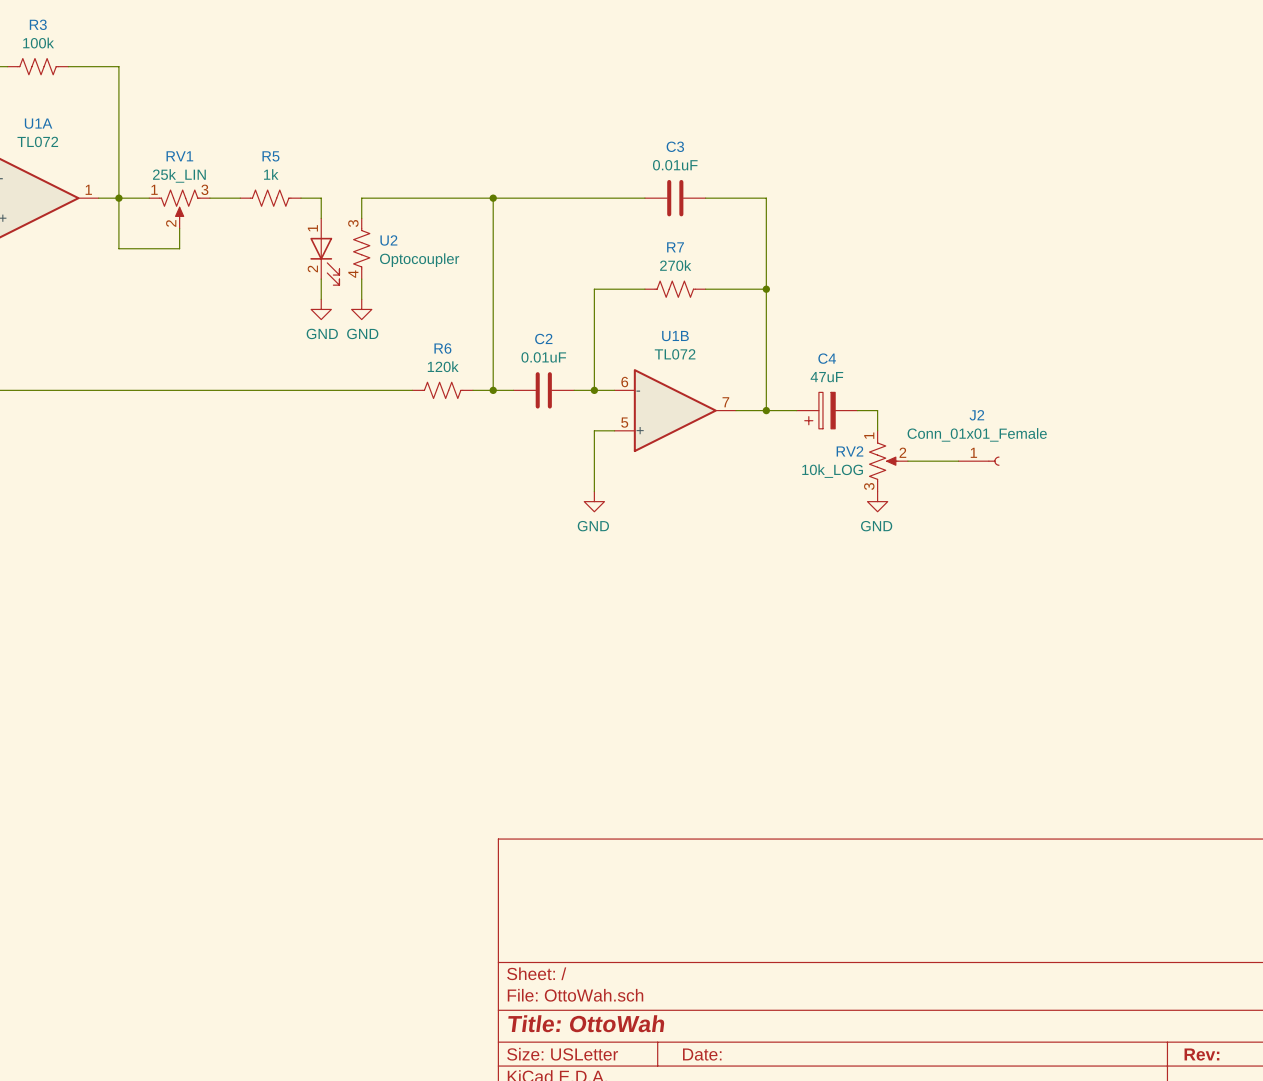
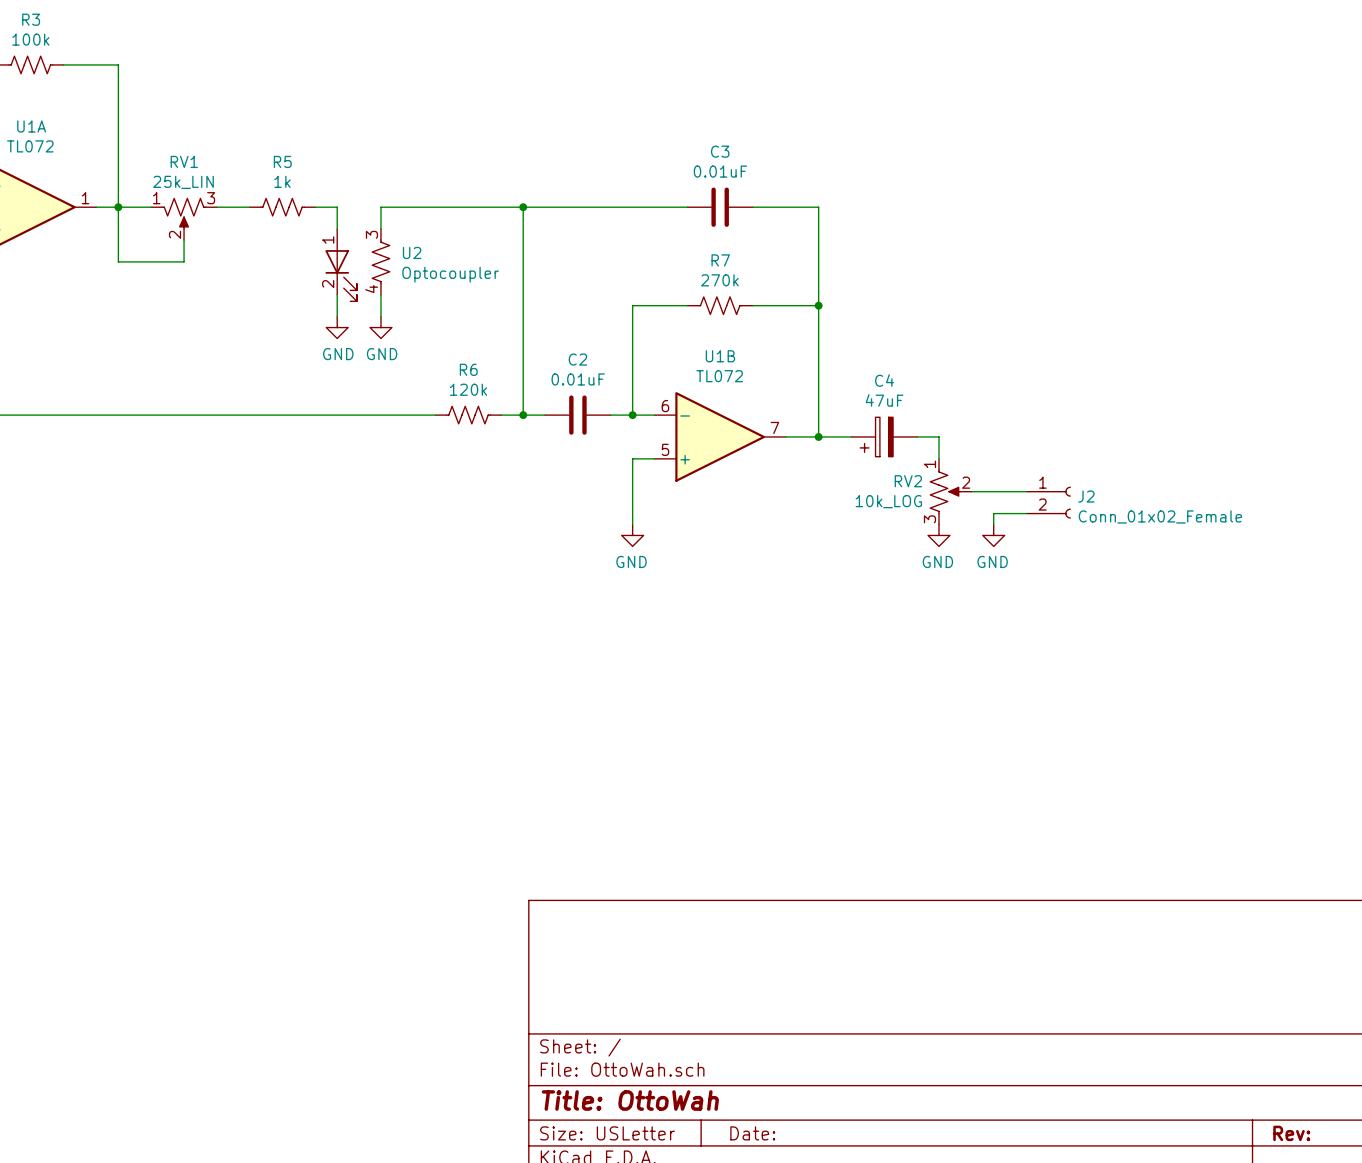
J2 name position: J2 (976, 415) -> J2 (1086, 496)
J2 value: Conn_01x01_Female (977, 434) -> Conn_01x02_Female (1160, 516)
J2 symbol: [958, 456, 1000, 466] -> [1026, 486, 1071, 519]
wire: none -> (1026, 513) (993, 513) (993, 524)
power symbol: none -> GND (993, 535)

